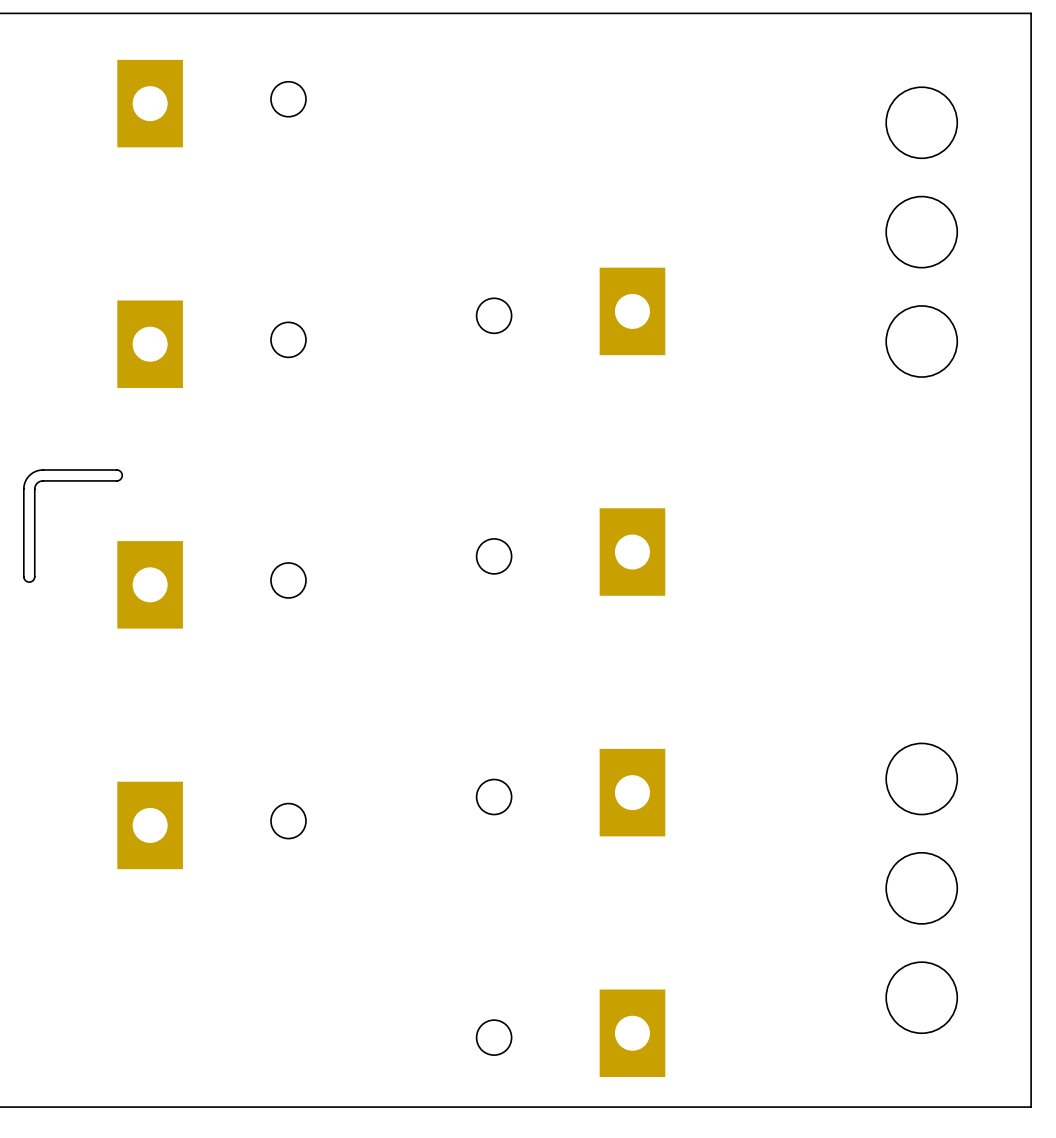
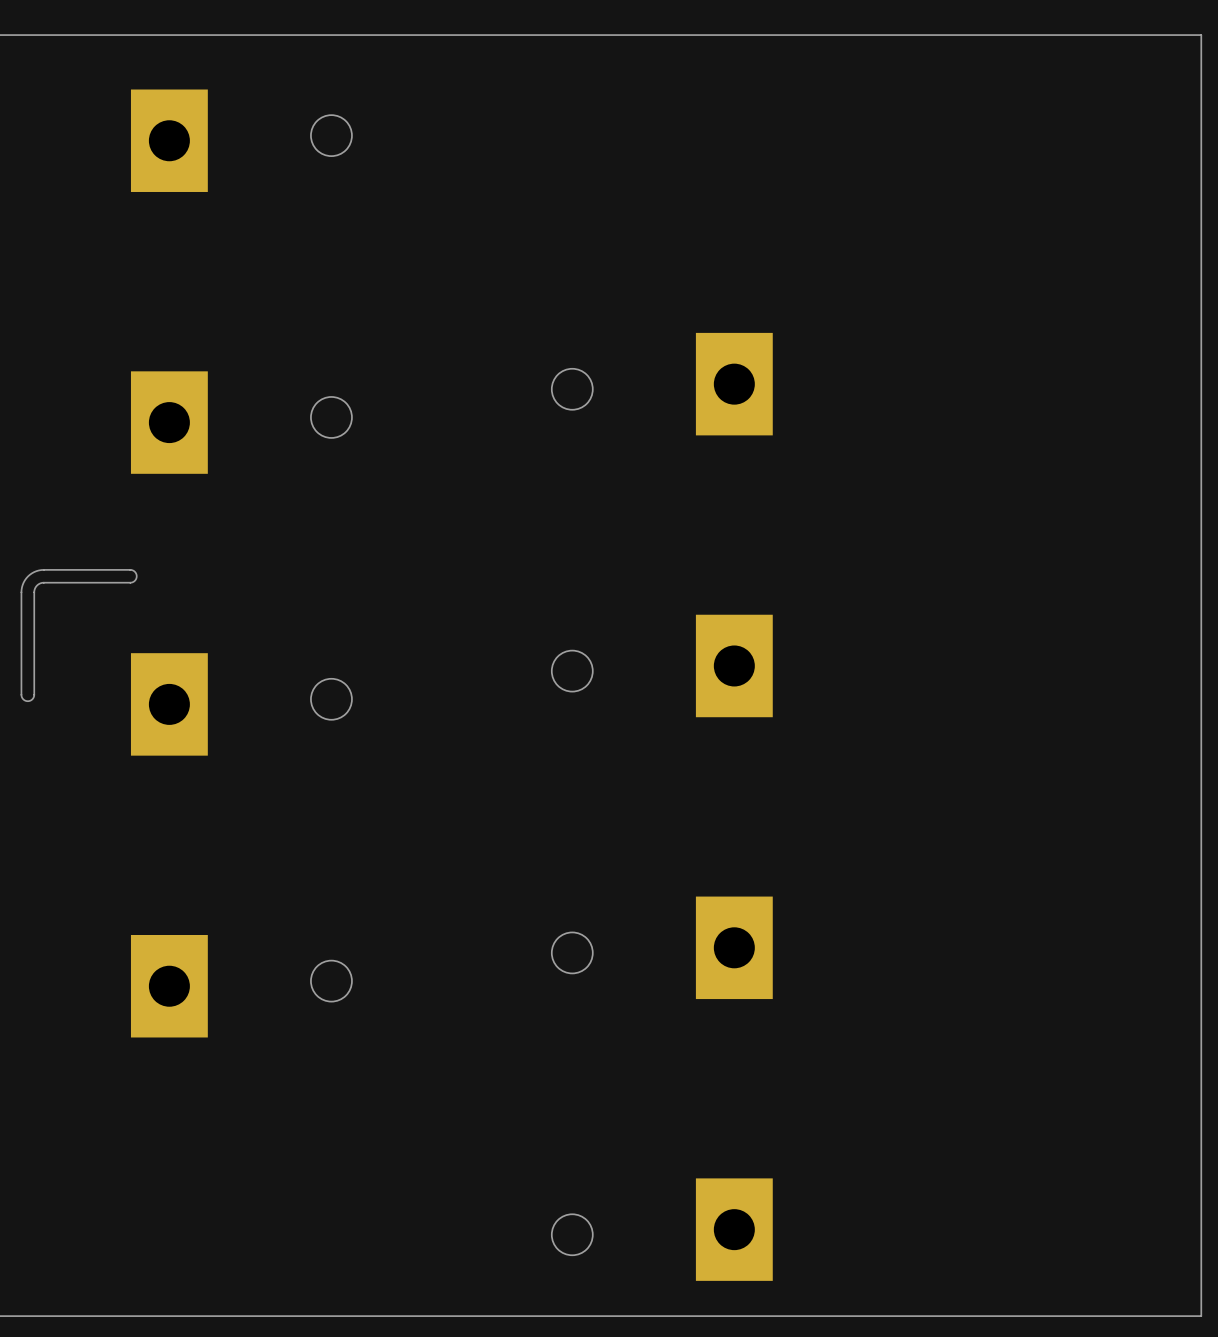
round board edge: [885, 86, 959, 160] -> none
round board edge: [885, 195, 959, 269] -> none
round board edge: [885, 305, 959, 378] -> none
round board edge: [885, 742, 959, 816] -> none
round board edge: [885, 851, 959, 925] -> none
round board edge: [885, 961, 959, 1035] -> none

